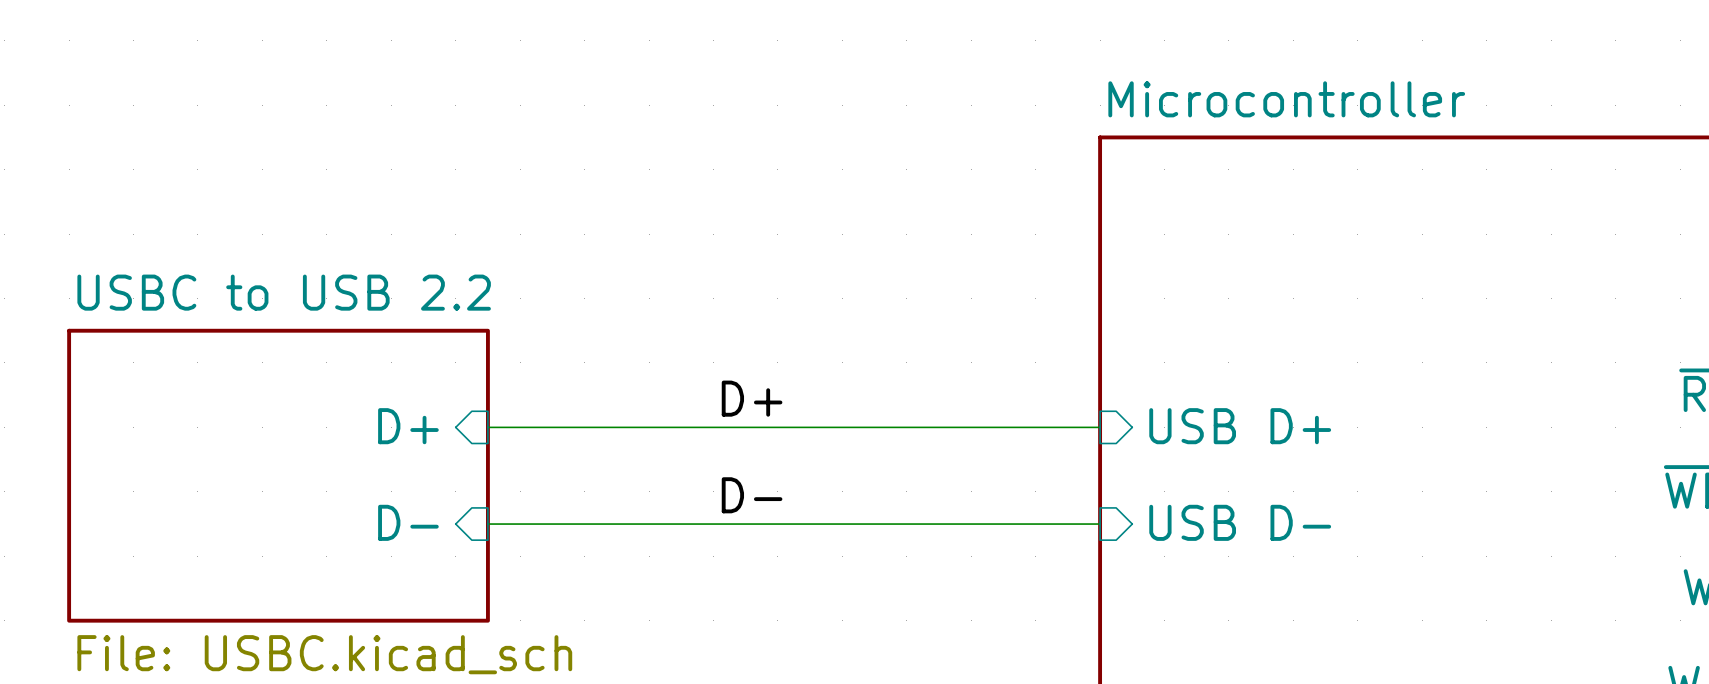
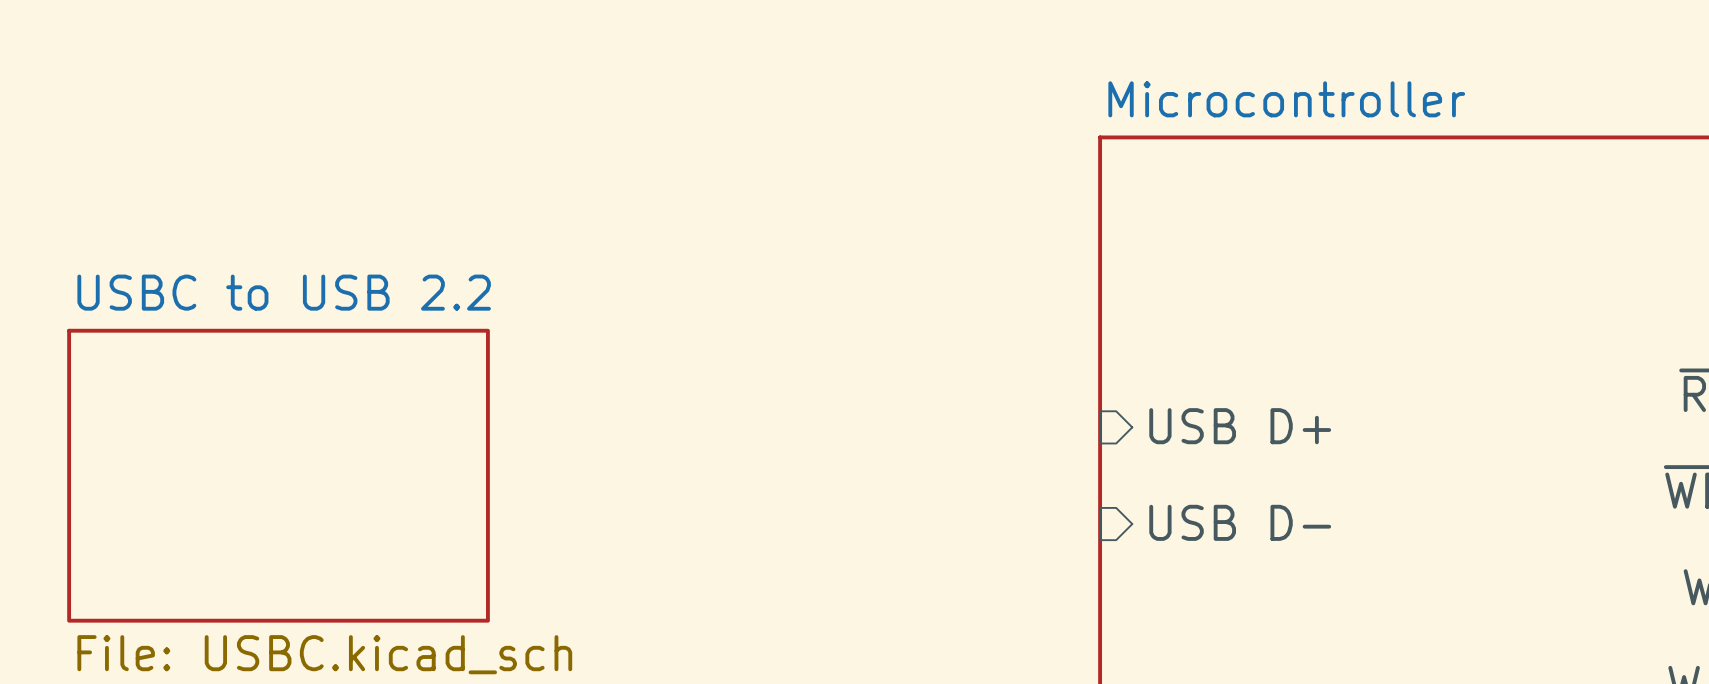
label: D+ (752, 398) -> none
sheet pin: D+ (408, 426) -> none
wire: (487, 427) (1100, 427) -> none
label: D- (752, 495) -> none
sheet pin: D- (408, 522) -> none
wire: (487, 524) (1100, 524) -> none

